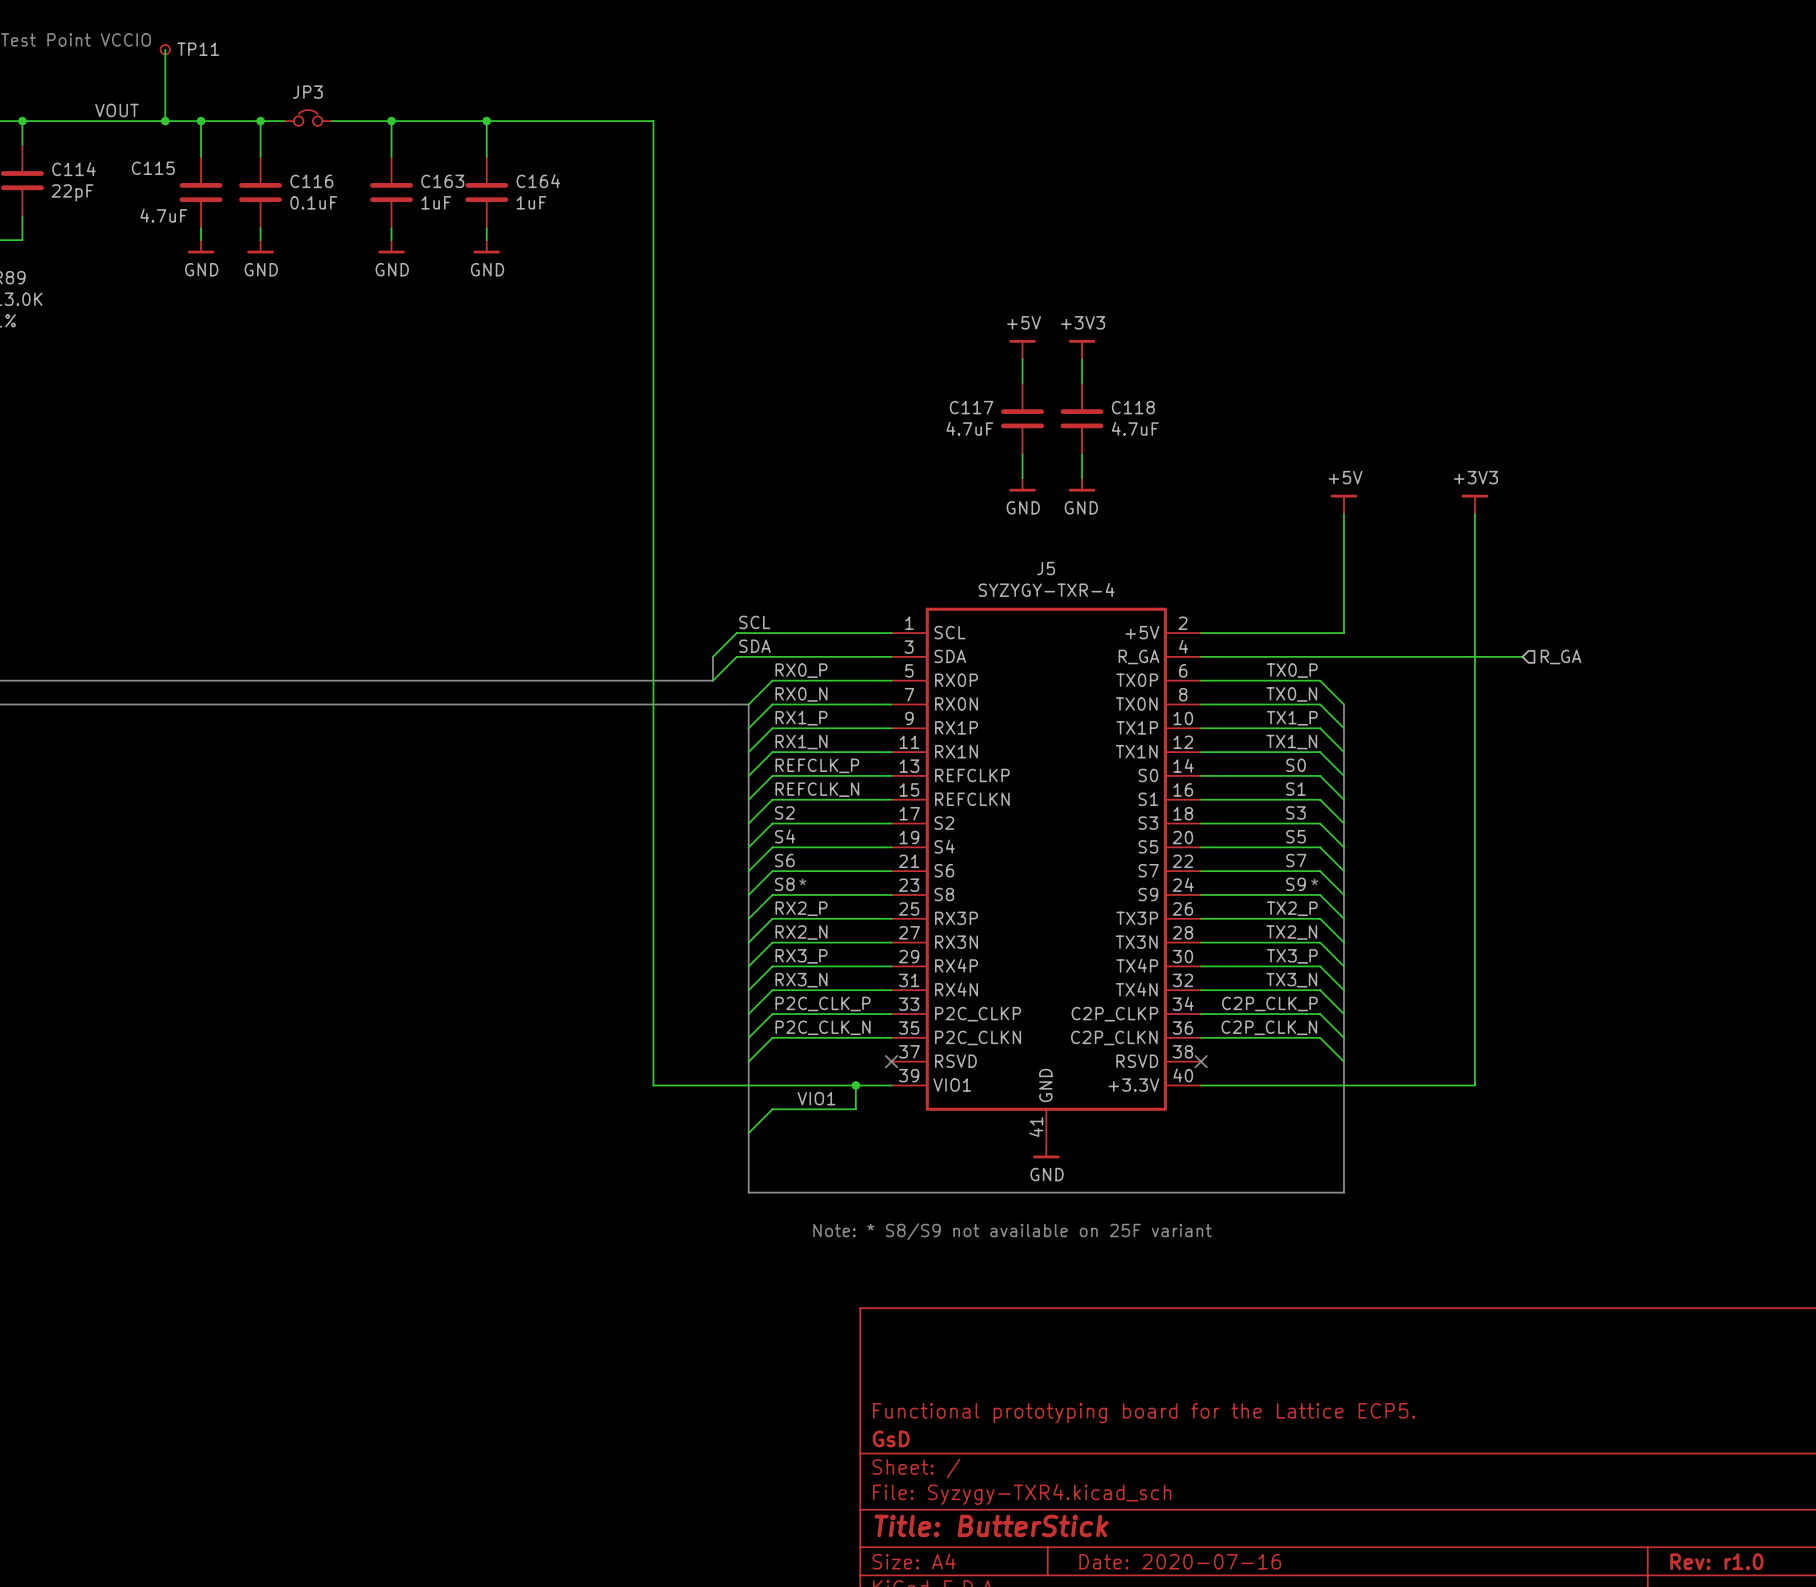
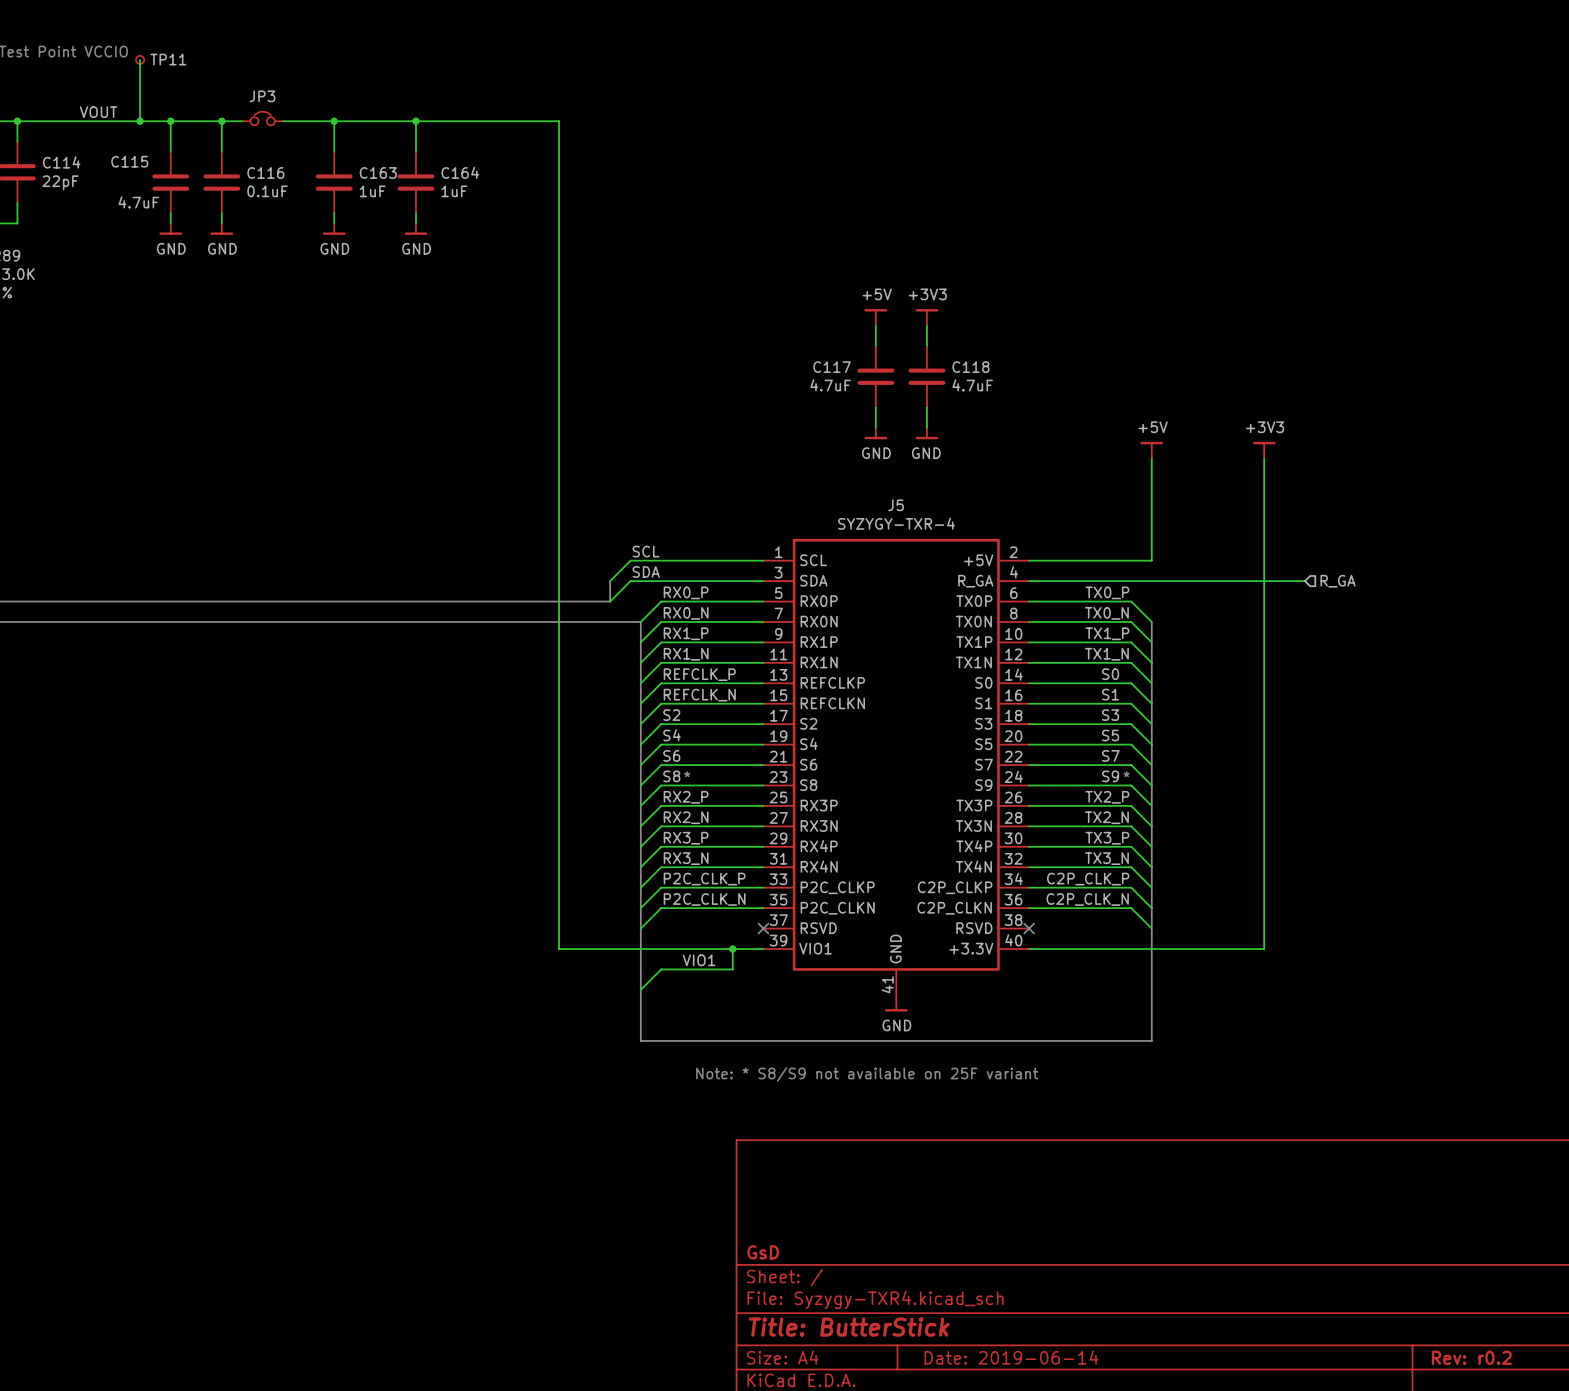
title block: Functional prototyping board for the Lattice ECP5. (1144, 1413) -> none
title block: Date: 2020-07-16 (1180, 1561) -> Date: 2019-06-14 (1011, 1357)
title block: Rev: r1.0 (1716, 1561) -> Rev: r0.2 (1471, 1357)

